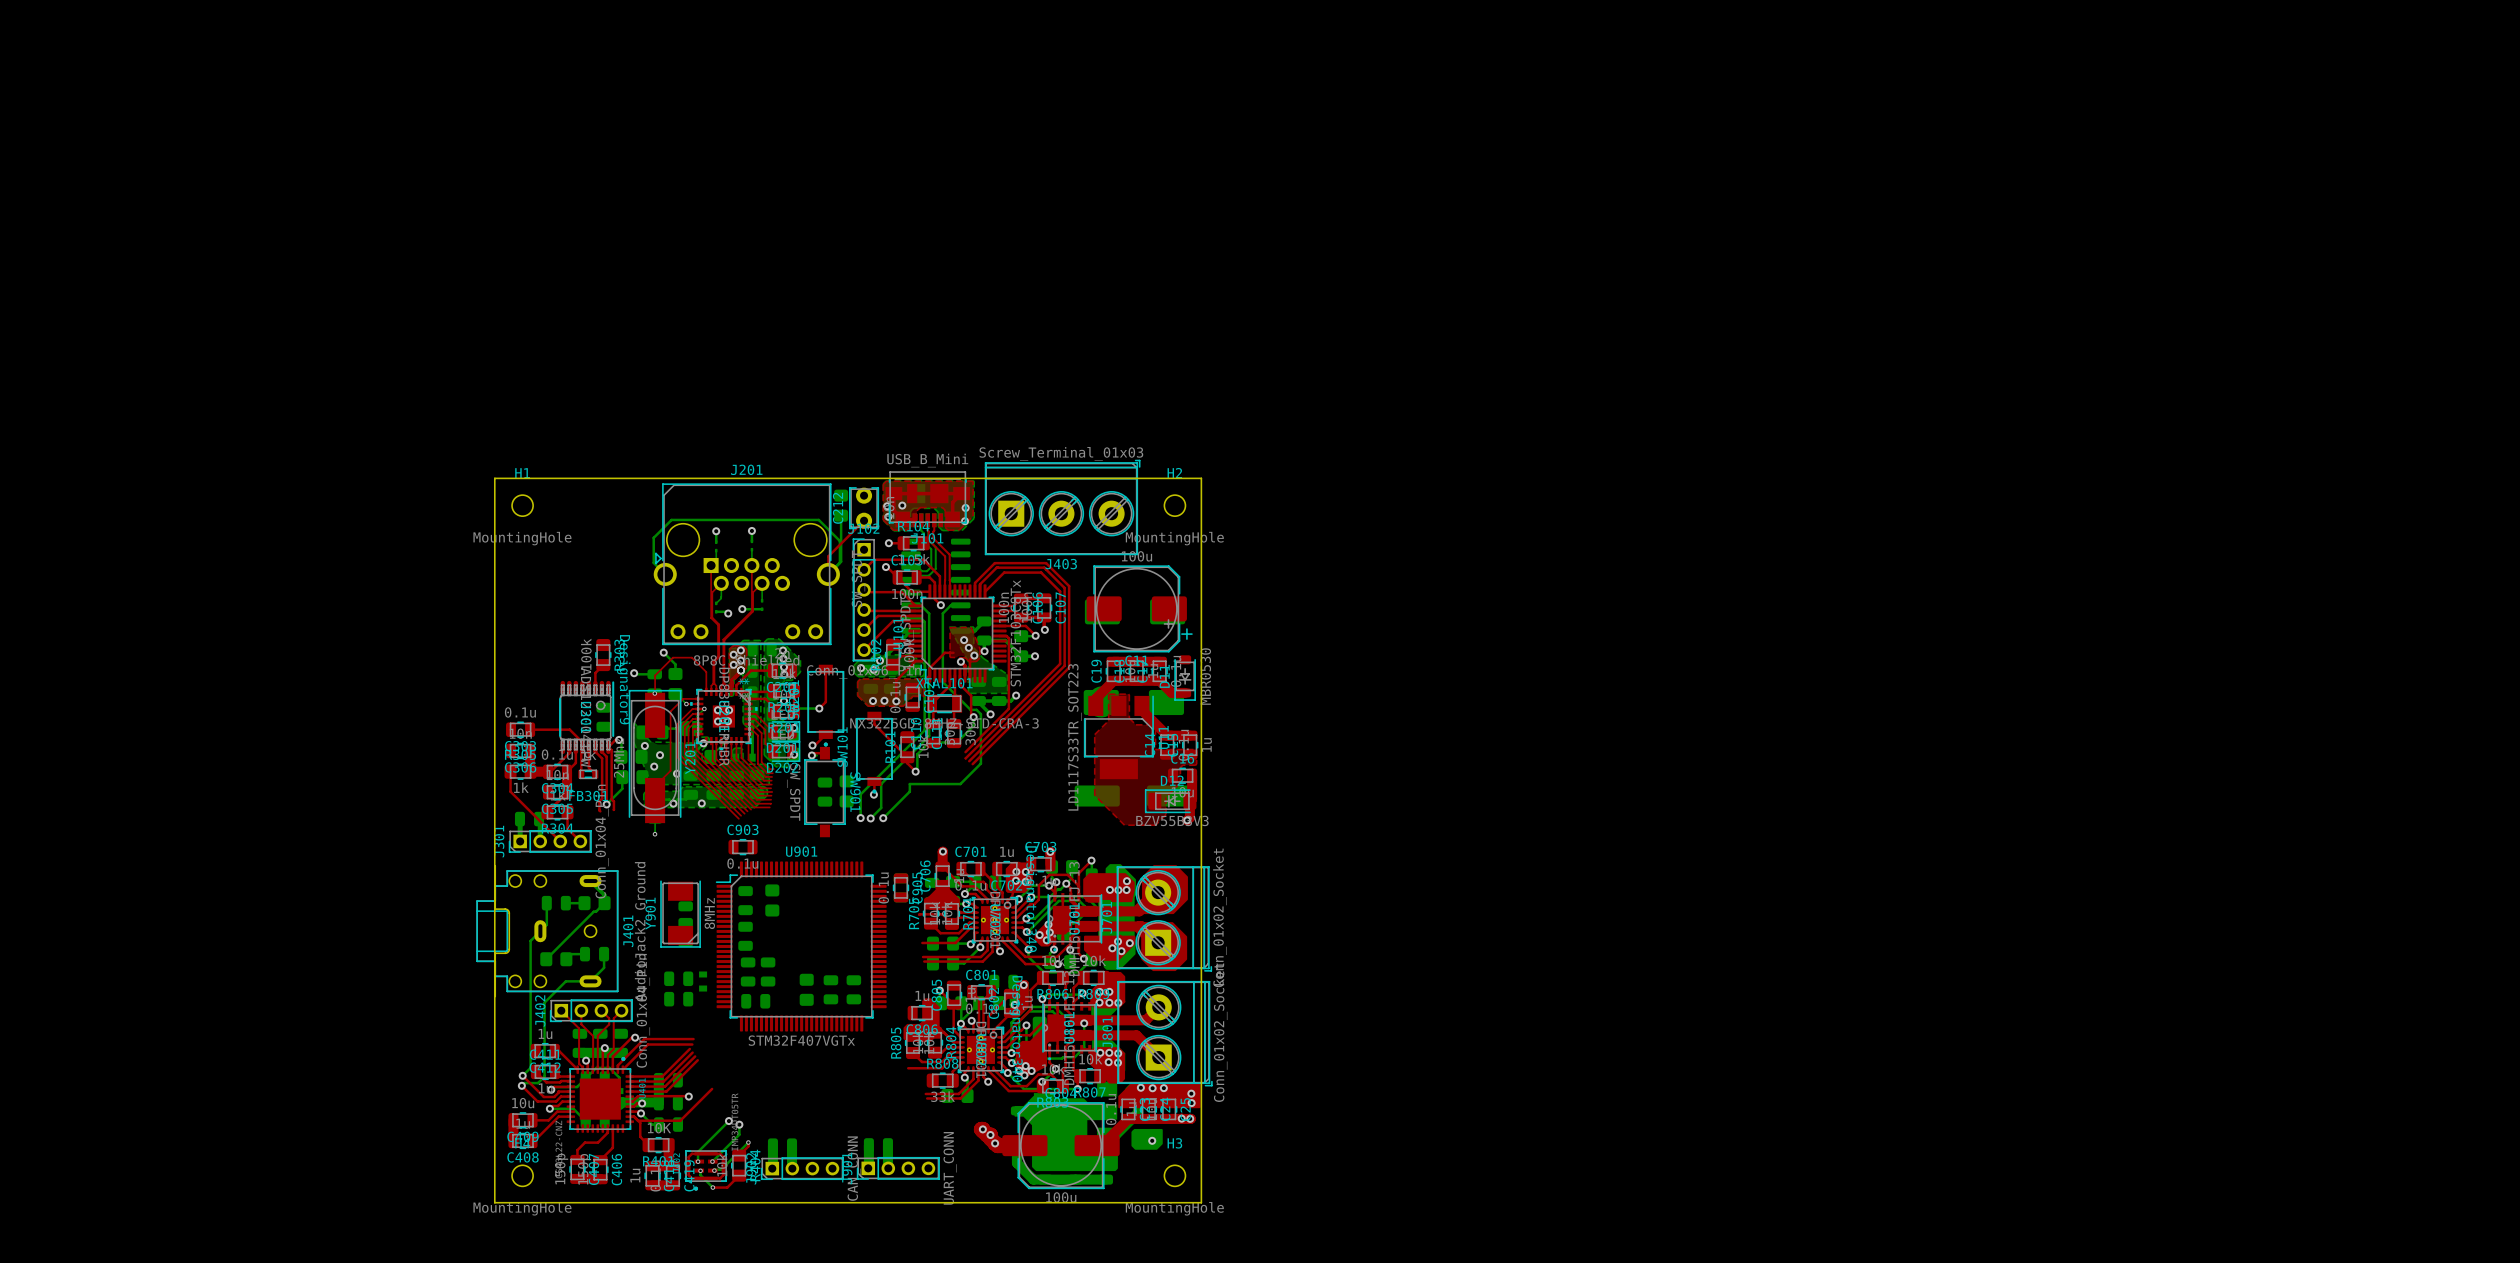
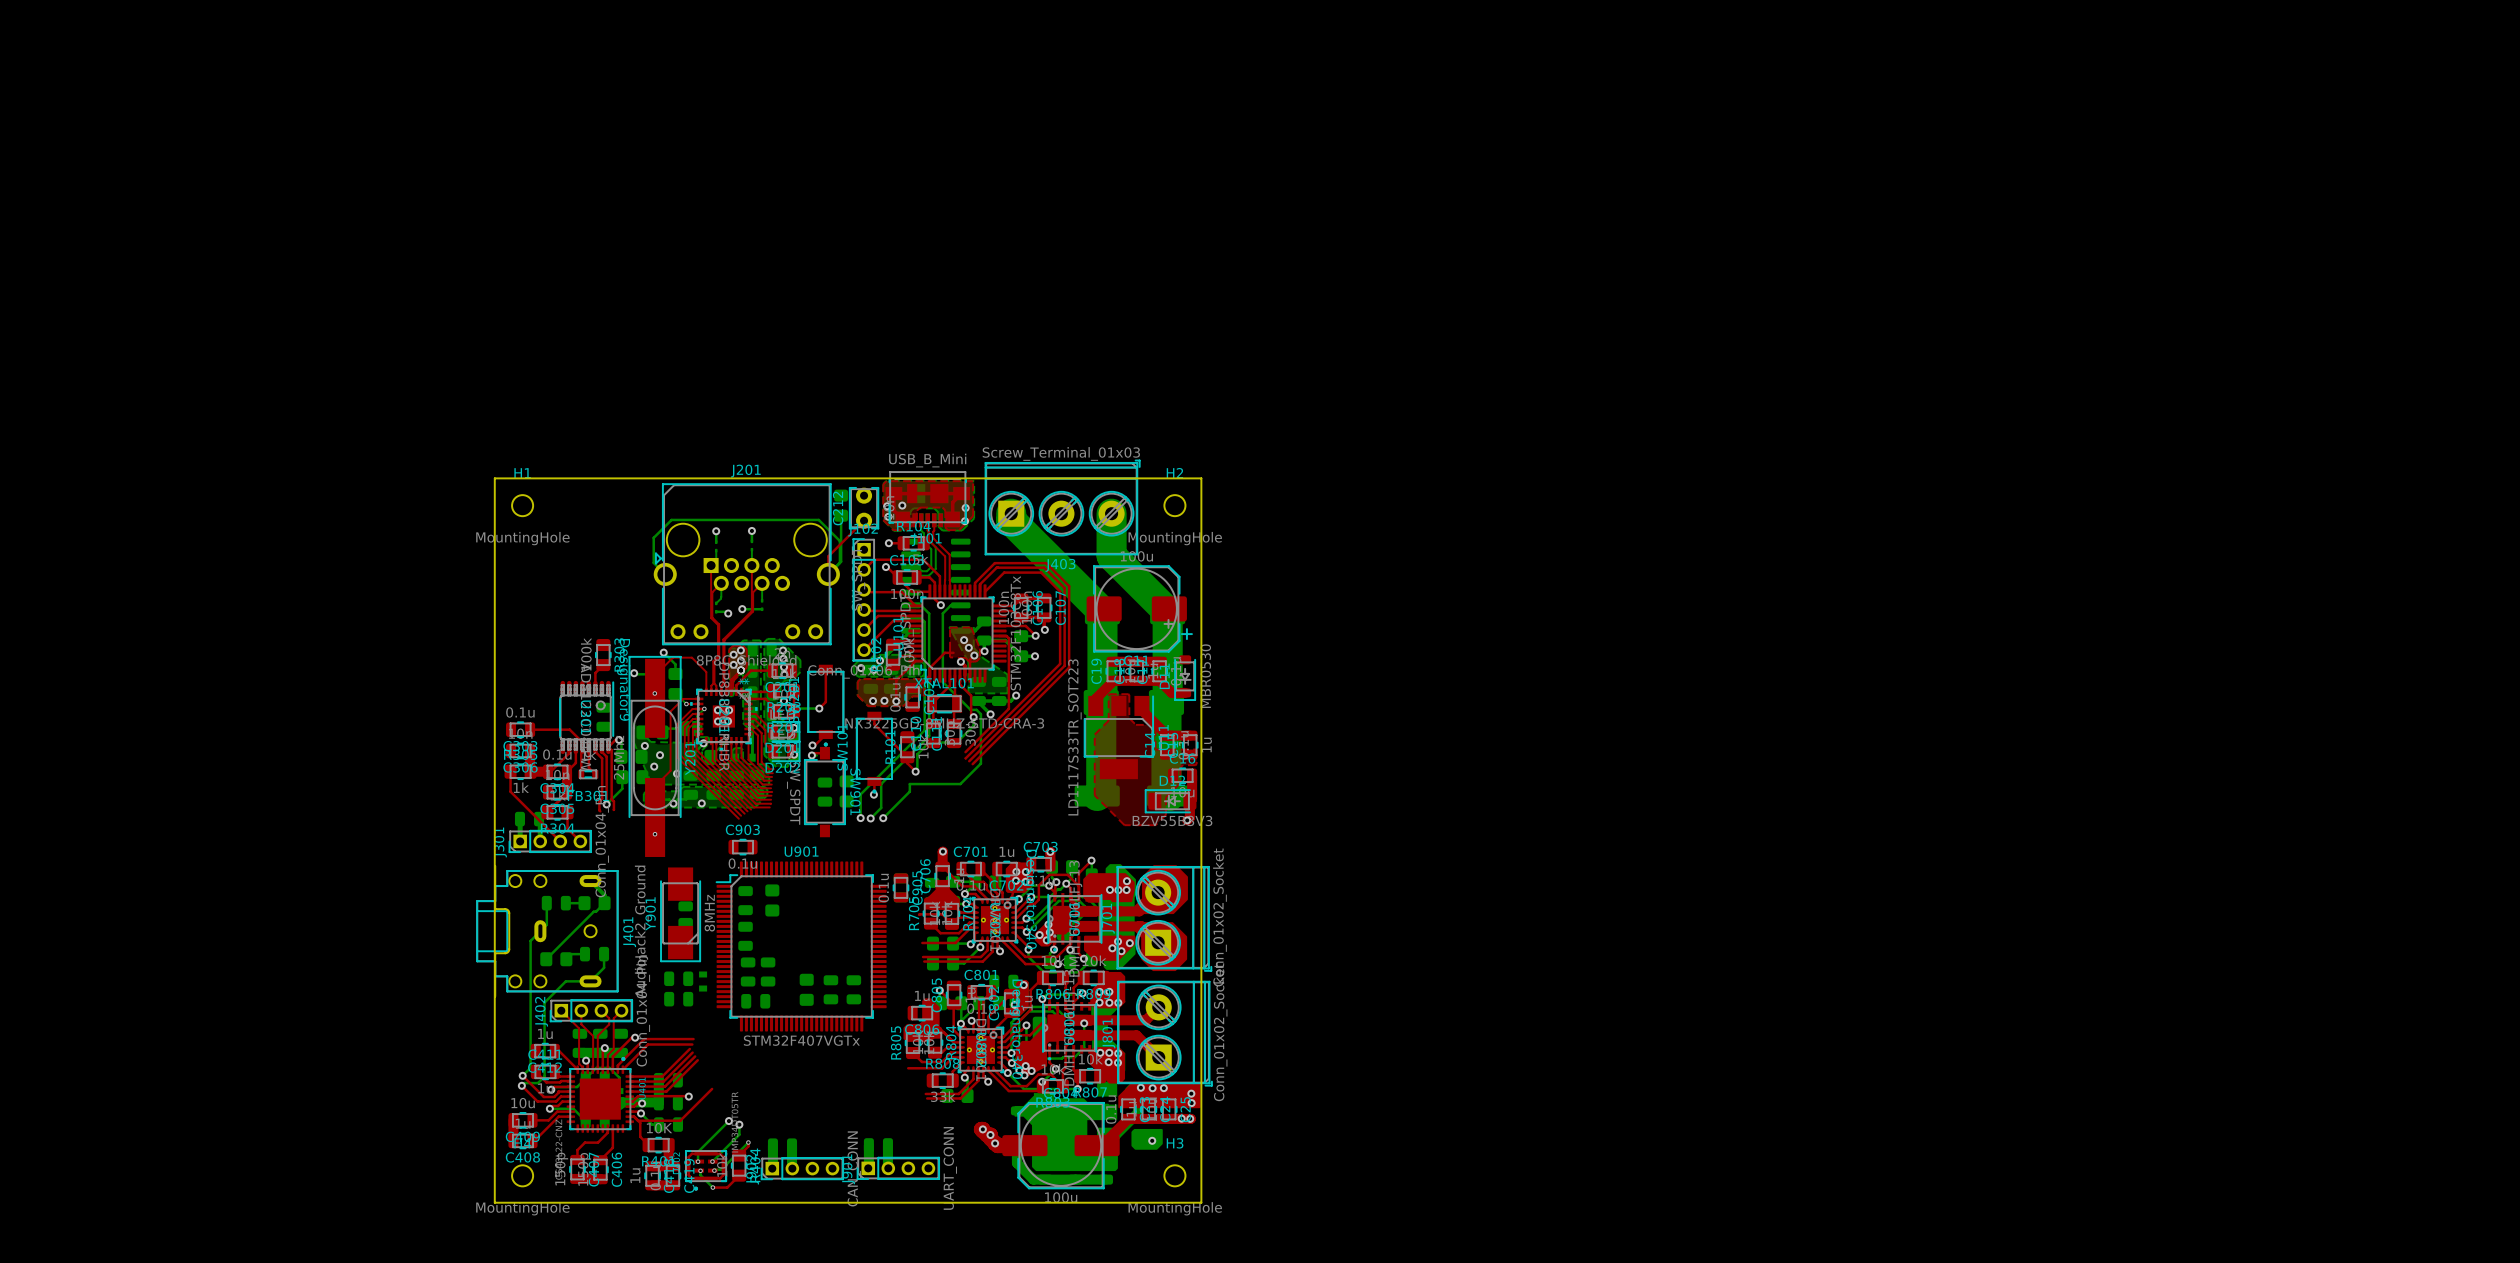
bottom track: none -> (1011, 513) (1011, 520) (1102, 611) (1102, 701)
bottom track: none -> (1111, 513) (1111, 555) (1167, 611) (1166, 792) (1169, 796)
Y201 footprint: [628, 690, 682, 824] -> [628, 656, 682, 857]
bottom track: none -> (1101, 702) (1101, 791) (1097, 796)
Y901 footprint: [660, 880, 701, 948] -> [660, 867, 701, 962]

